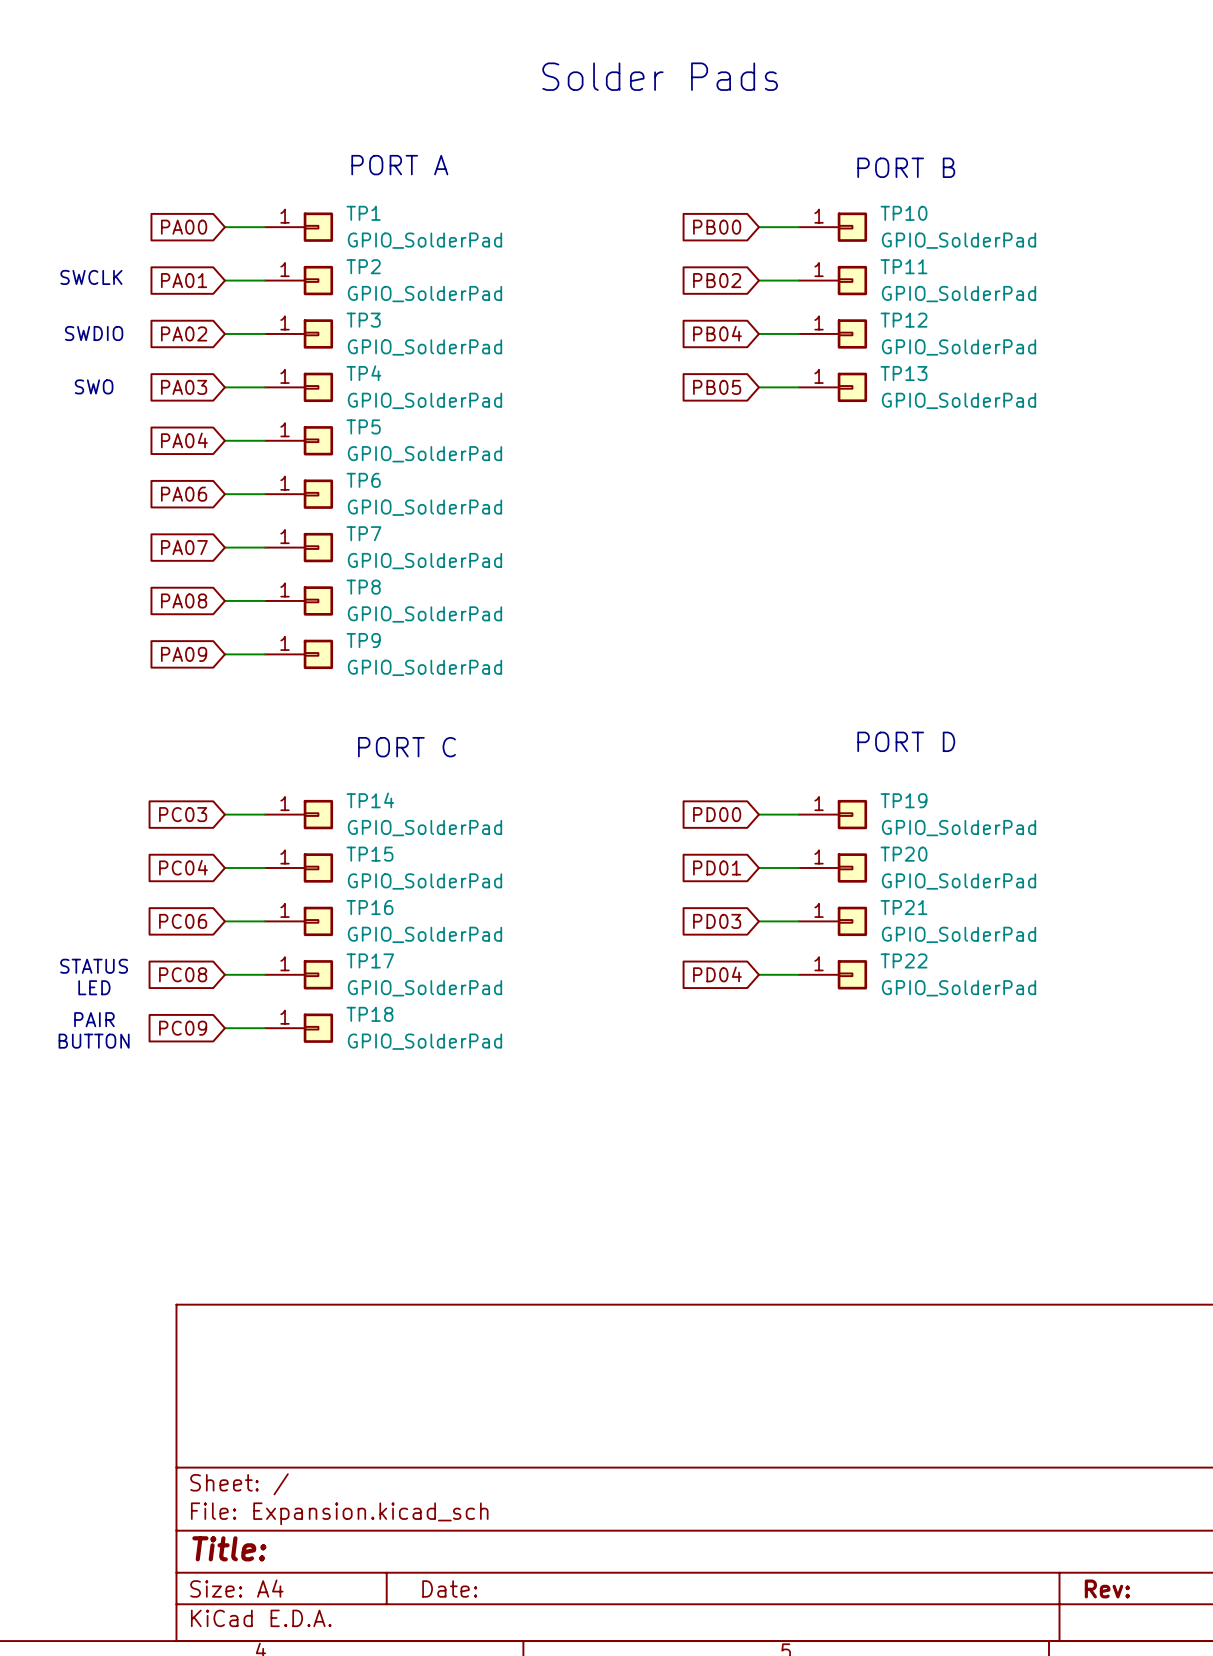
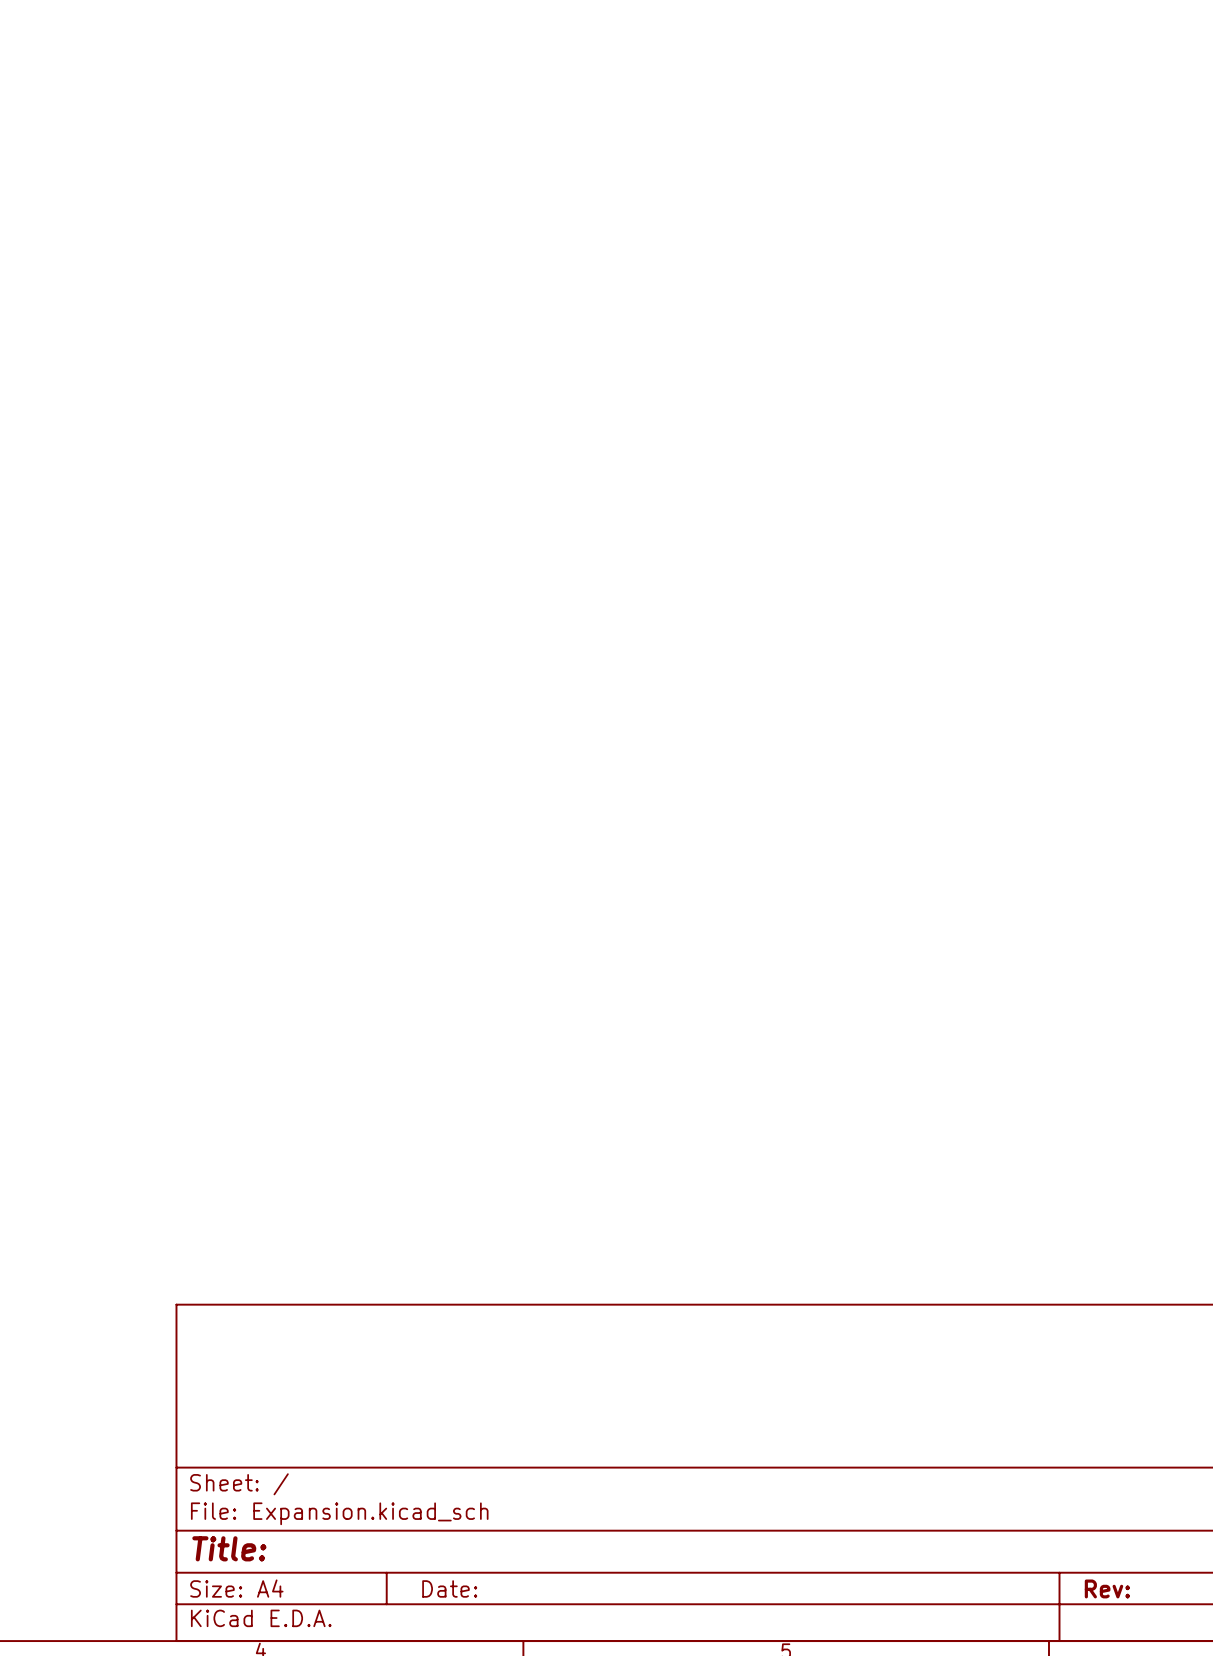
text: Solder Pads (660, 76) -> none
text: PORT A (399, 165) -> none
text: PORT B (906, 167) -> none
global label: PA00 (184, 227) -> none
wire: (224, 227) (264, 227) -> none
TP1: GPIO_SolderPad (299, 227) -> none
global label: PB00 (717, 227) -> none
wire: (758, 227) (799, 227) -> none
TP10: GPIO_SolderPad (833, 227) -> none
text: SWCLK (91, 277) -> none
global label: PA01 (184, 280) -> none
wire: (224, 280) (264, 280) -> none
TP2: GPIO_SolderPad (299, 280) -> none
global label: PB02 (717, 280) -> none
wire: (758, 280) (799, 280) -> none
TP11: GPIO_SolderPad (833, 280) -> none
text: SWDIO (94, 333) -> none
global label: PA02 (184, 333) -> none
wire: (224, 333) (264, 333) -> none
TP3: GPIO_SolderPad (299, 333) -> none
global label: PB04 (717, 333) -> none
wire: (758, 333) (799, 333) -> none
TP12: GPIO_SolderPad (833, 333) -> none
text: SWO (94, 386) -> none
global label: PA03 (184, 387) -> none
wire: (224, 387) (264, 387) -> none
TP4: GPIO_SolderPad (299, 387) -> none
global label: PB05 (717, 387) -> none
wire: (758, 387) (799, 387) -> none
TP13: GPIO_SolderPad (833, 387) -> none
global label: PA04 (184, 440) -> none
wire: (224, 440) (264, 440) -> none
TP5: GPIO_SolderPad (299, 440) -> none
global label: PA06 (184, 494) -> none
wire: (224, 494) (264, 494) -> none
TP6: GPIO_SolderPad (299, 494) -> none
global label: PA07 (184, 547) -> none
wire: (224, 547) (264, 547) -> none
TP7: GPIO_SolderPad (299, 547) -> none
global label: PA08 (184, 600) -> none
wire: (224, 600) (264, 600) -> none
TP8: GPIO_SolderPad (299, 600) -> none
global label: PA09 (184, 654) -> none
wire: (224, 654) (264, 654) -> none
TP9: GPIO_SolderPad (299, 654) -> none
text: PORT D (906, 741) -> none
text: PORT C (406, 747) -> none
global label: PC03 (183, 814) -> none
wire: (224, 814) (264, 814) -> none
TP14: GPIO_SolderPad (299, 814) -> none
global label: PD00 (717, 814) -> none
wire: (758, 814) (799, 814) -> none
TP19: GPIO_SolderPad (833, 814) -> none
global label: PC04 (183, 867) -> none
wire: (224, 867) (264, 867) -> none
TP15: GPIO_SolderPad (299, 867) -> none
global label: PD01 (717, 867) -> none
wire: (758, 867) (799, 867) -> none
TP20: GPIO_SolderPad (833, 867) -> none
global label: PC06 (183, 921) -> none
wire: (224, 921) (264, 921) -> none
TP16: GPIO_SolderPad (299, 921) -> none
global label: PD03 (717, 921) -> none
wire: (758, 921) (799, 921) -> none
TP21: GPIO_SolderPad (833, 921) -> none
text: STATUS (94, 966) -> none
global label: PC08 (183, 974) -> none
wire: (224, 974) (264, 974) -> none
TP17: GPIO_SolderPad (299, 974) -> none
global label: PD04 (717, 974) -> none
wire: (758, 974) (799, 974) -> none
TP22: GPIO_SolderPad (833, 974) -> none
text: LED (94, 987) -> none
text: PAIR (94, 1019) -> none
global label: PC09 (183, 1028) -> none
wire: (224, 1028) (264, 1028) -> none
TP18: GPIO_SolderPad (299, 1028) -> none
text: BUTTON (94, 1041) -> none

